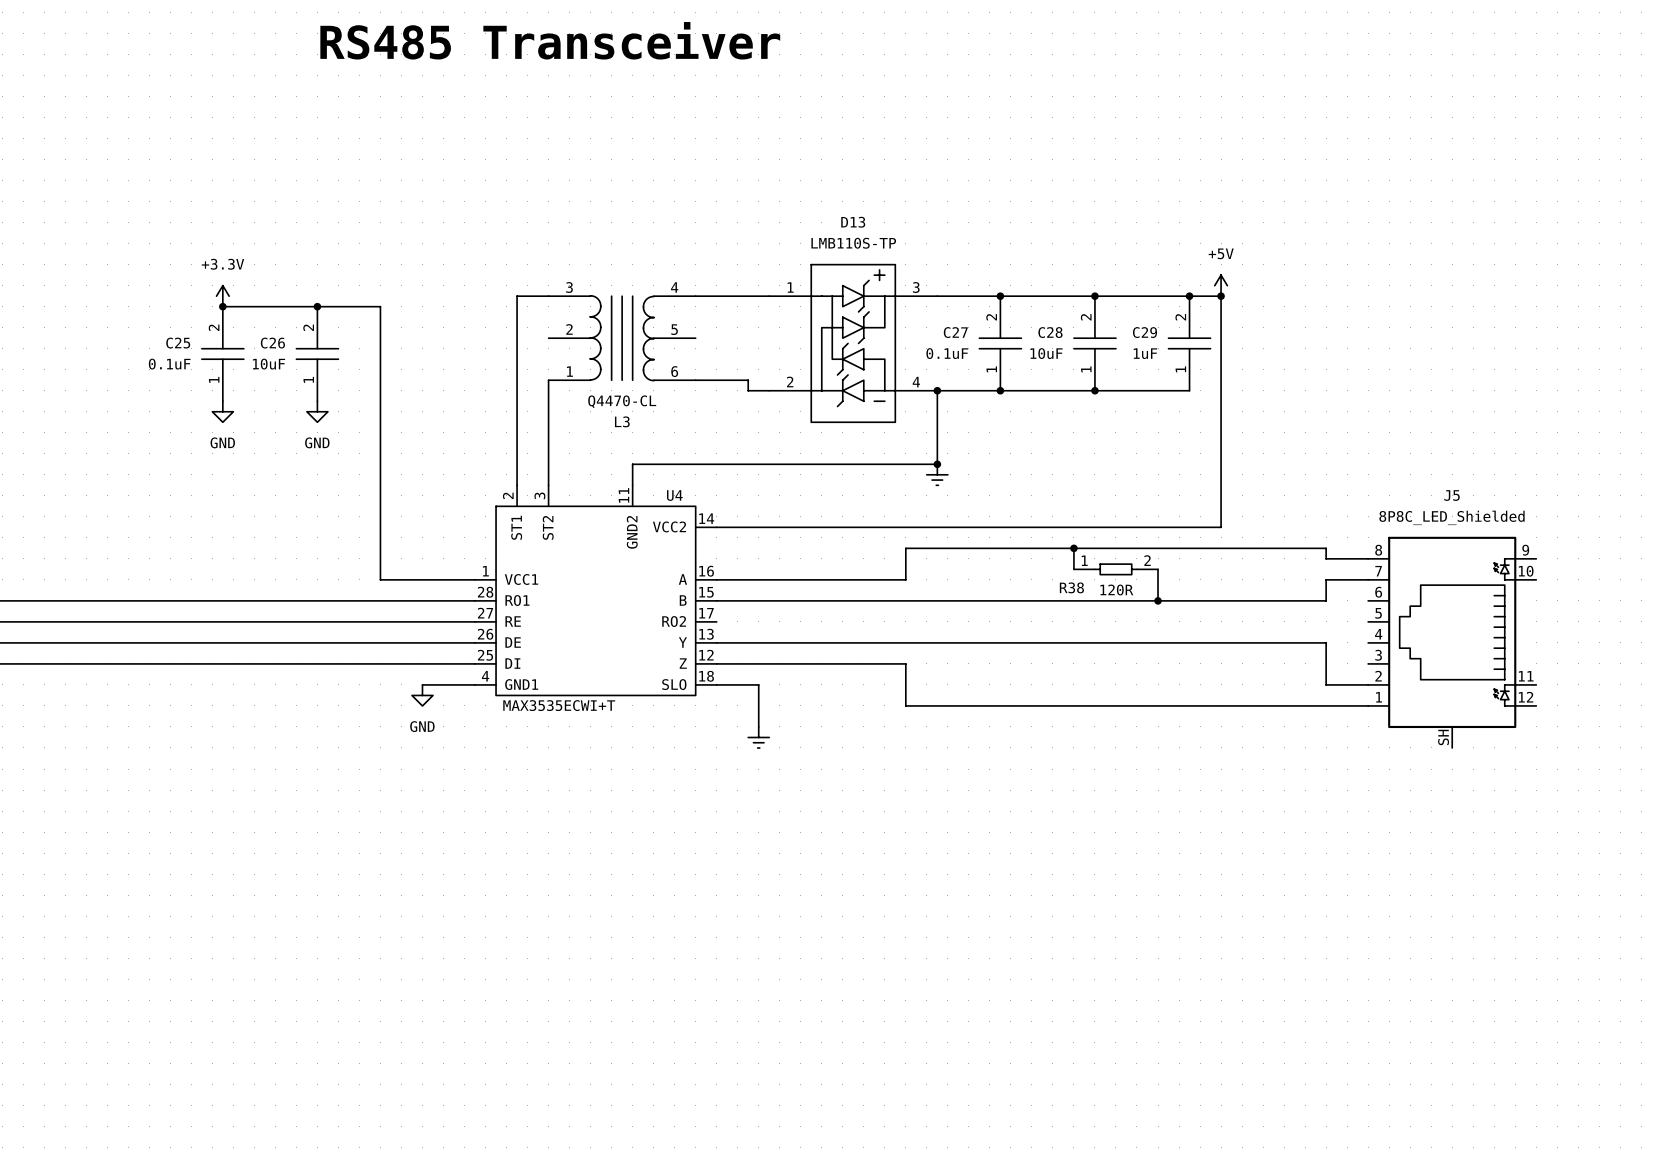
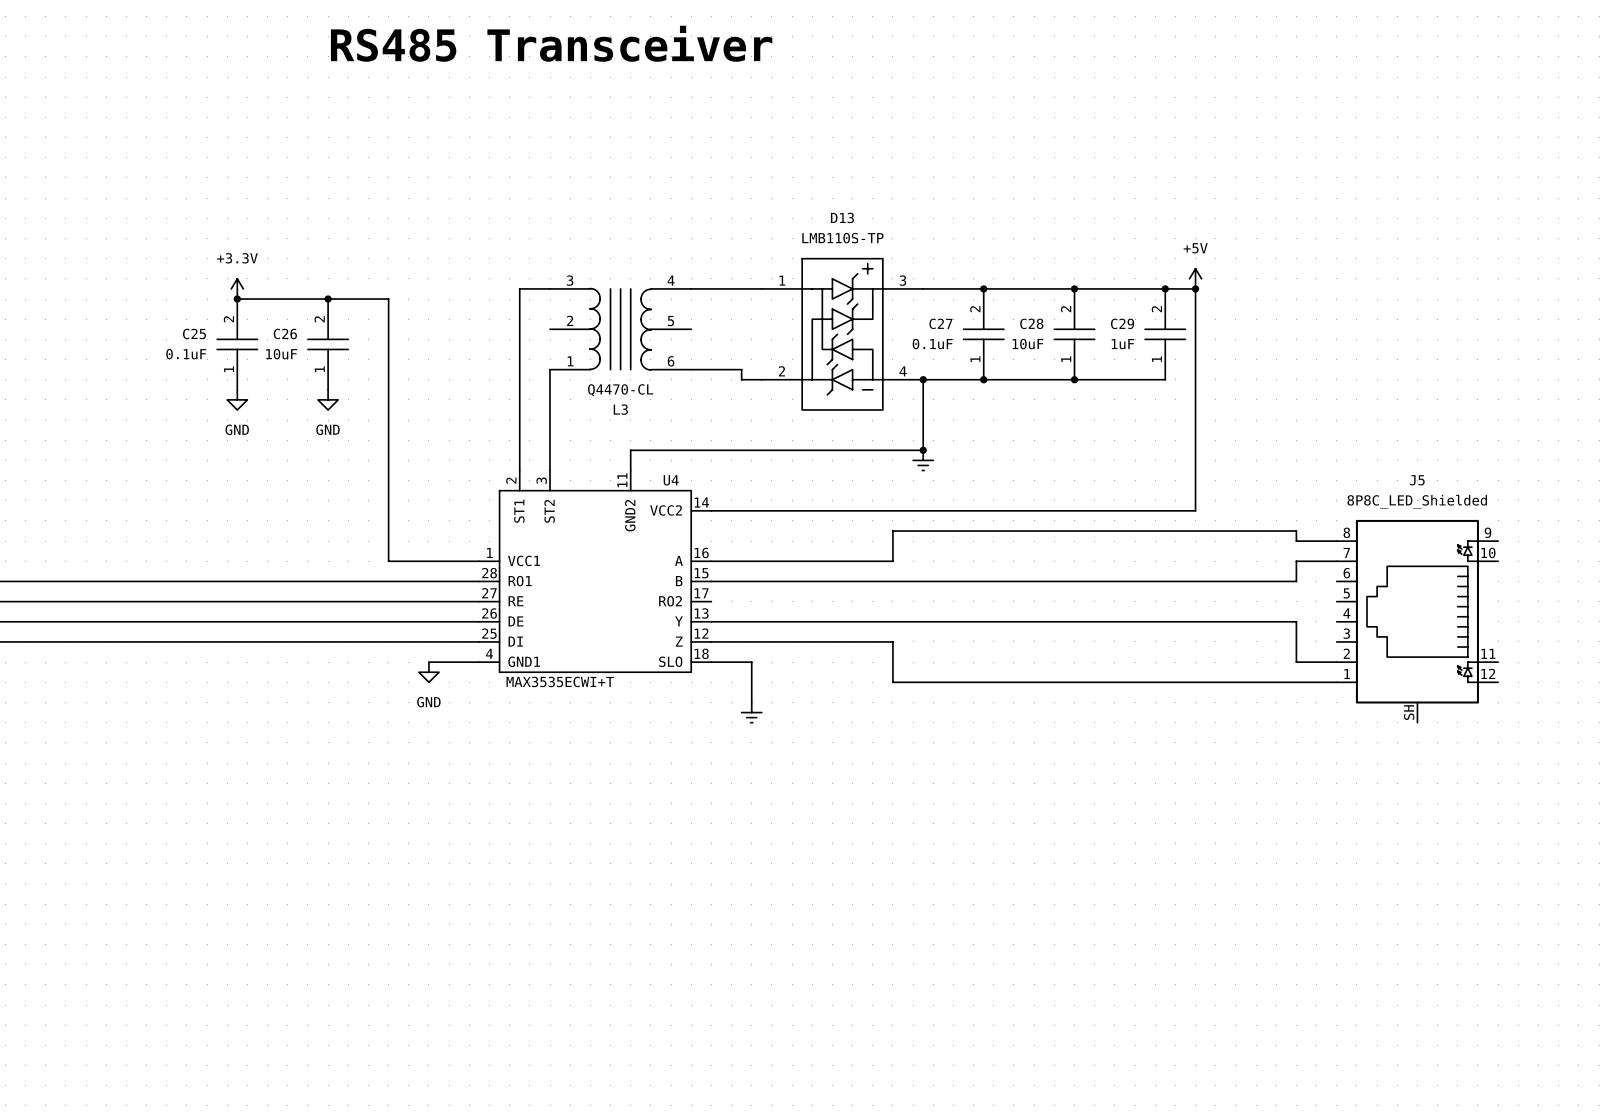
wire: (1073, 548) (1073, 569) -> none
junction: (1073, 548) -> none
R38: (1115, 569) -> none
wire: (1158, 569) (1158, 600) -> none
junction: (1158, 600) -> none

